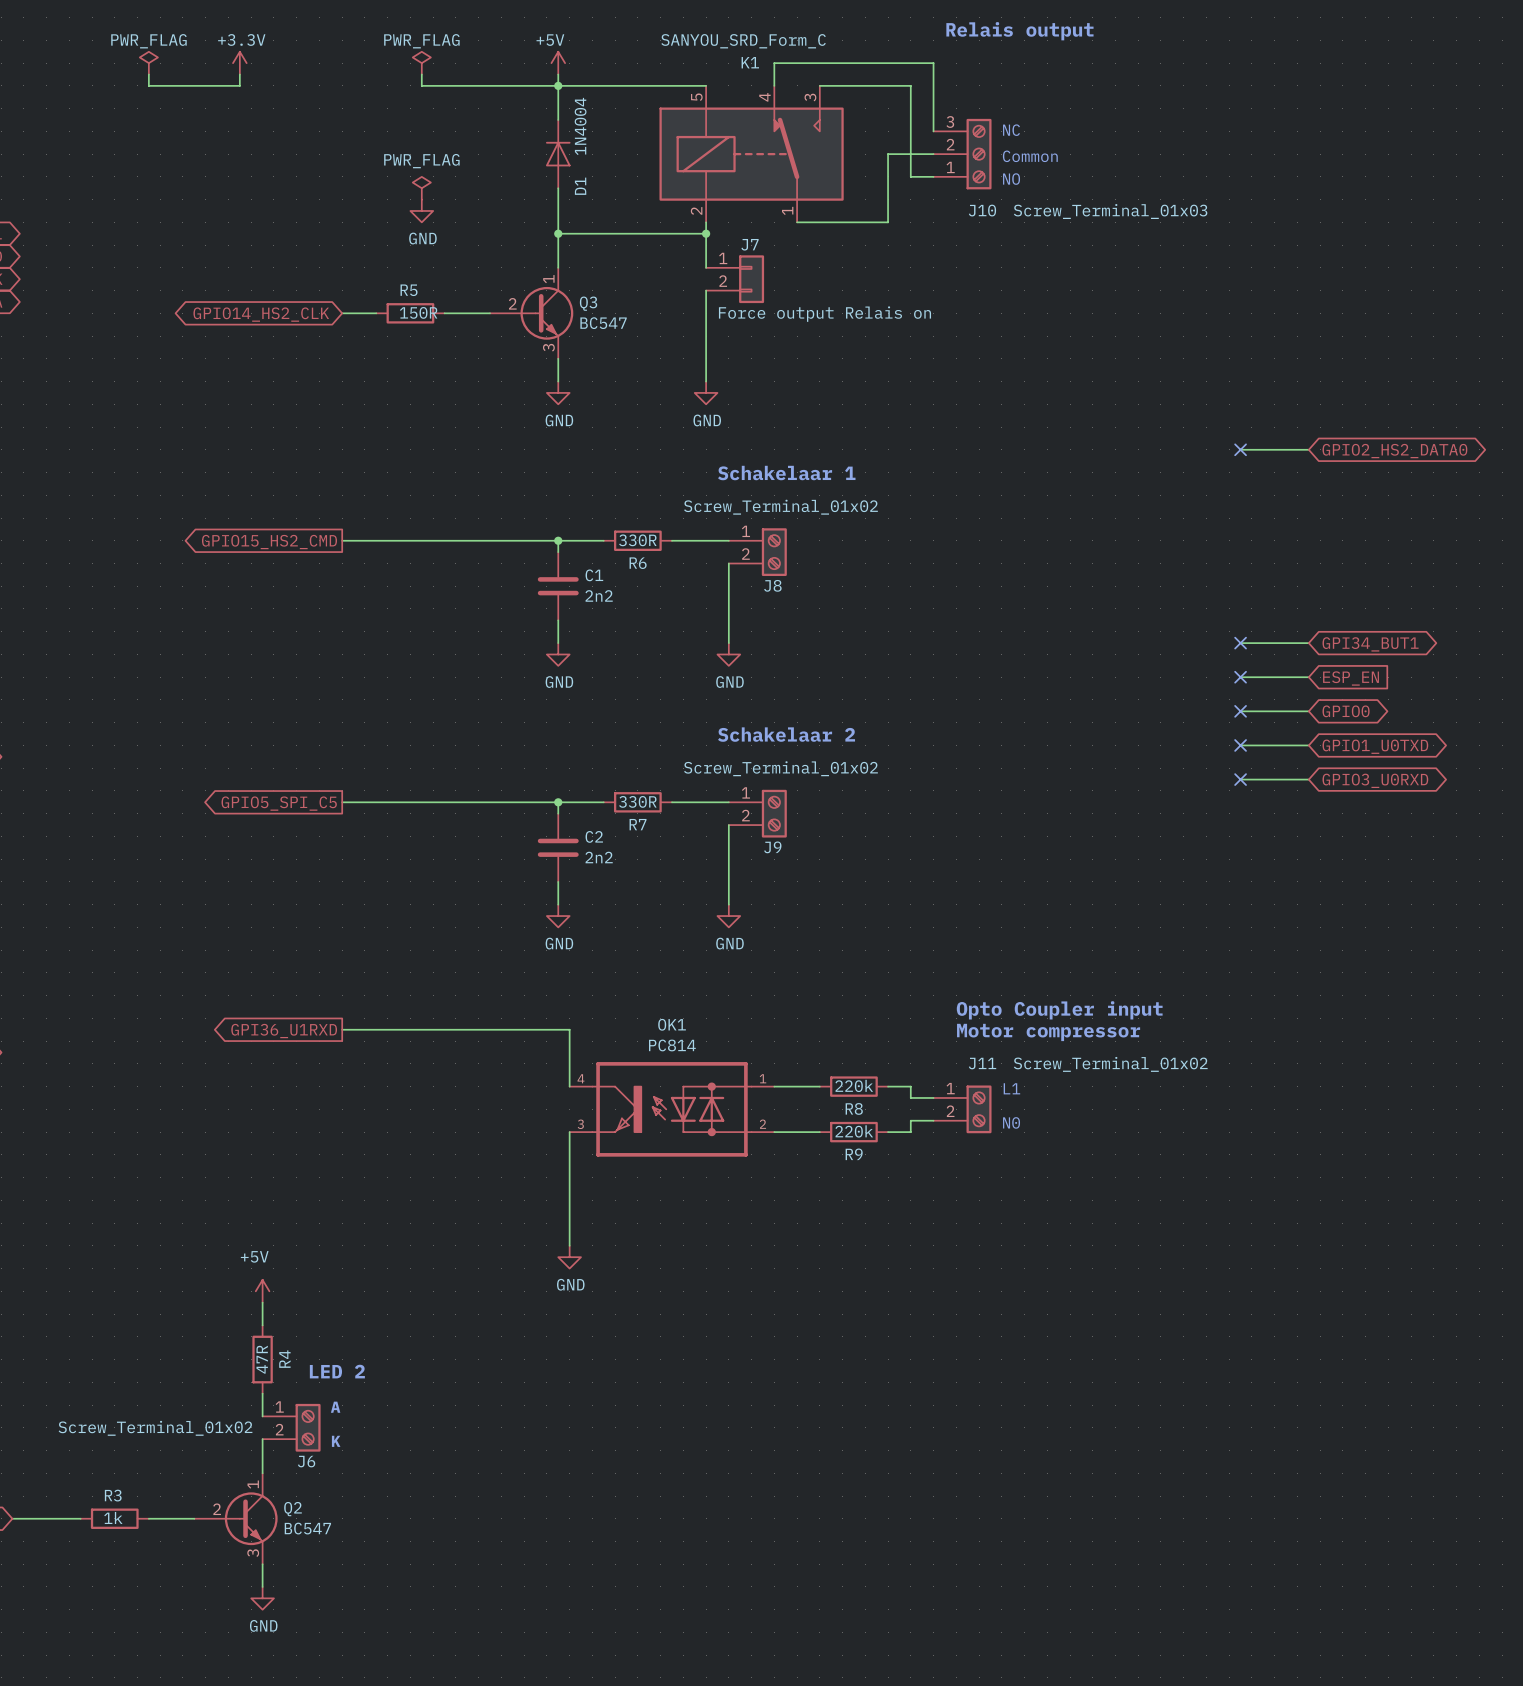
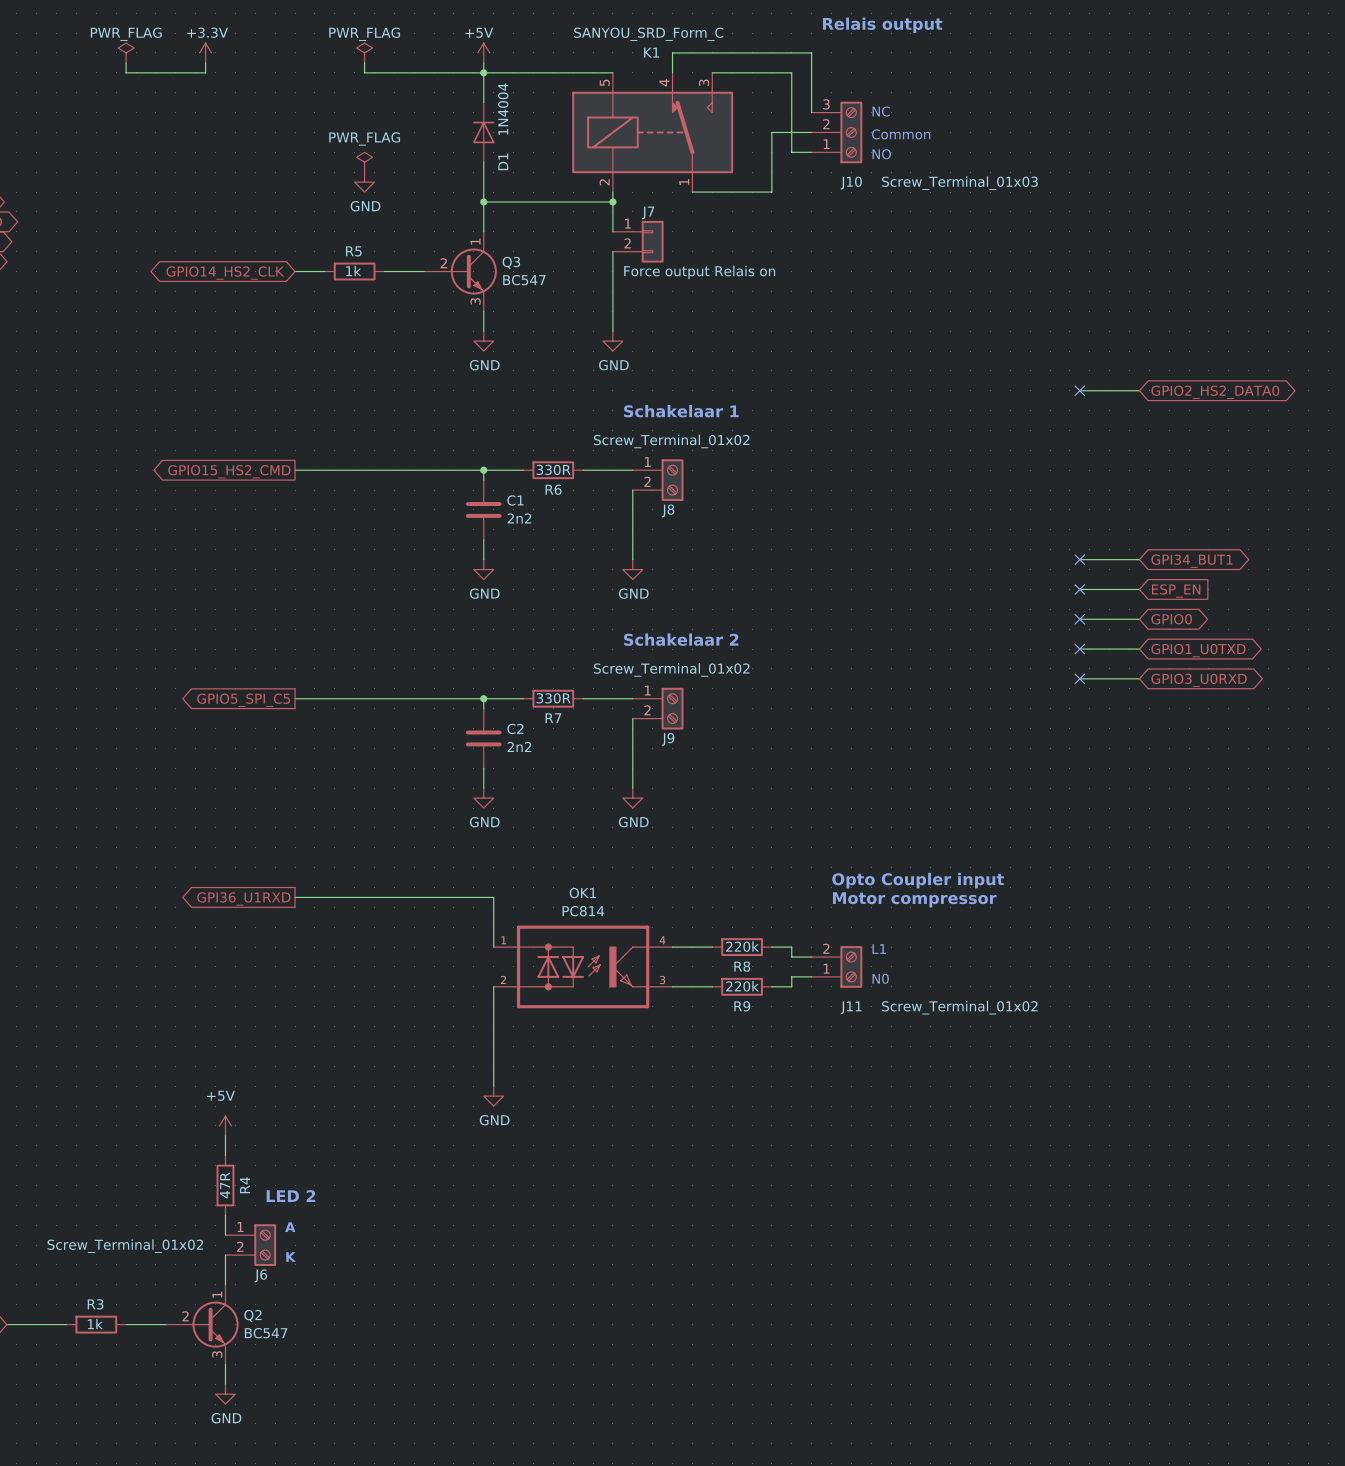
R5 value: 150R (418, 312) -> 1k (353, 270)
OK1 flip: as is (671, 1109) -> left-right (583, 966)
J11 flip: as is (979, 1109) -> up-down (851, 966)

